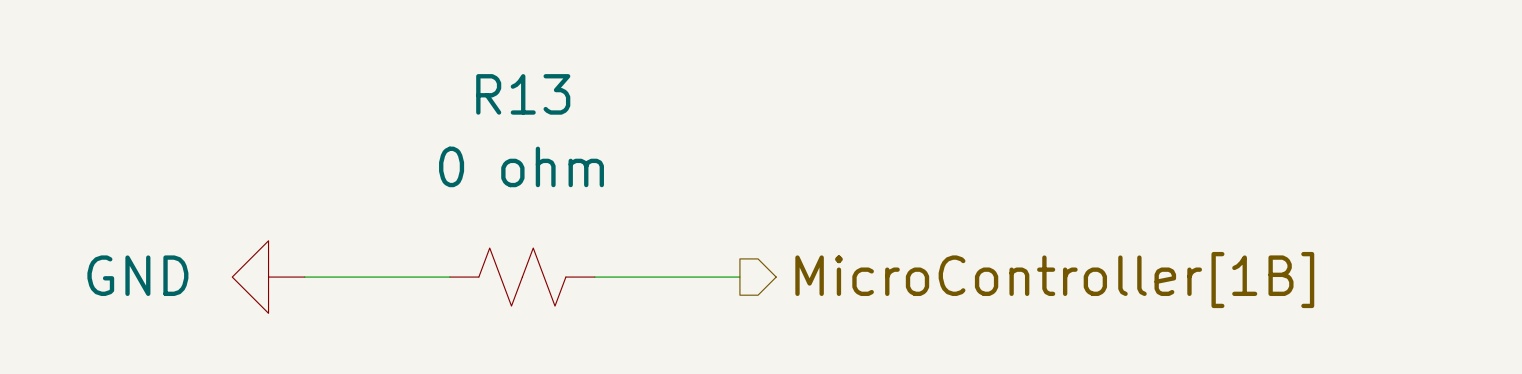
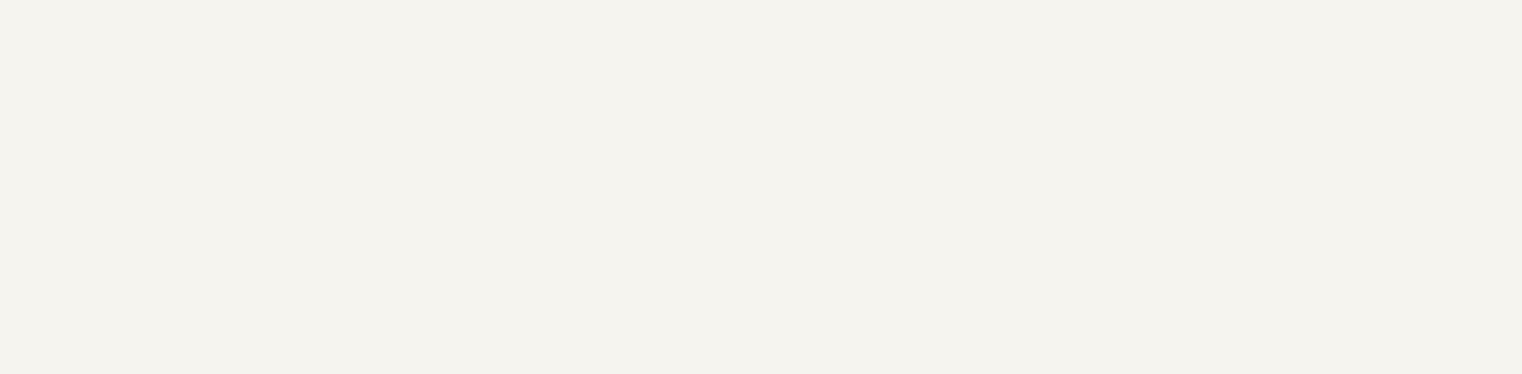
power symbol: GND (268, 277) -> none
wire: (304, 277) (449, 277) -> none
R13: 0 ohm (522, 277) -> none
wire: (594, 277) (739, 277) -> none
hierarchical label: MicroController[1B] (1054, 280) -> none

